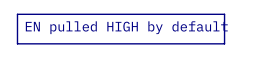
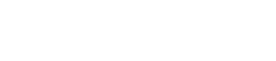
line: (17, 14) (224, 14) (224, 43) (17, 43) (17, 14) -> none
text: EN pulled HIGH by default (126, 27) -> none

